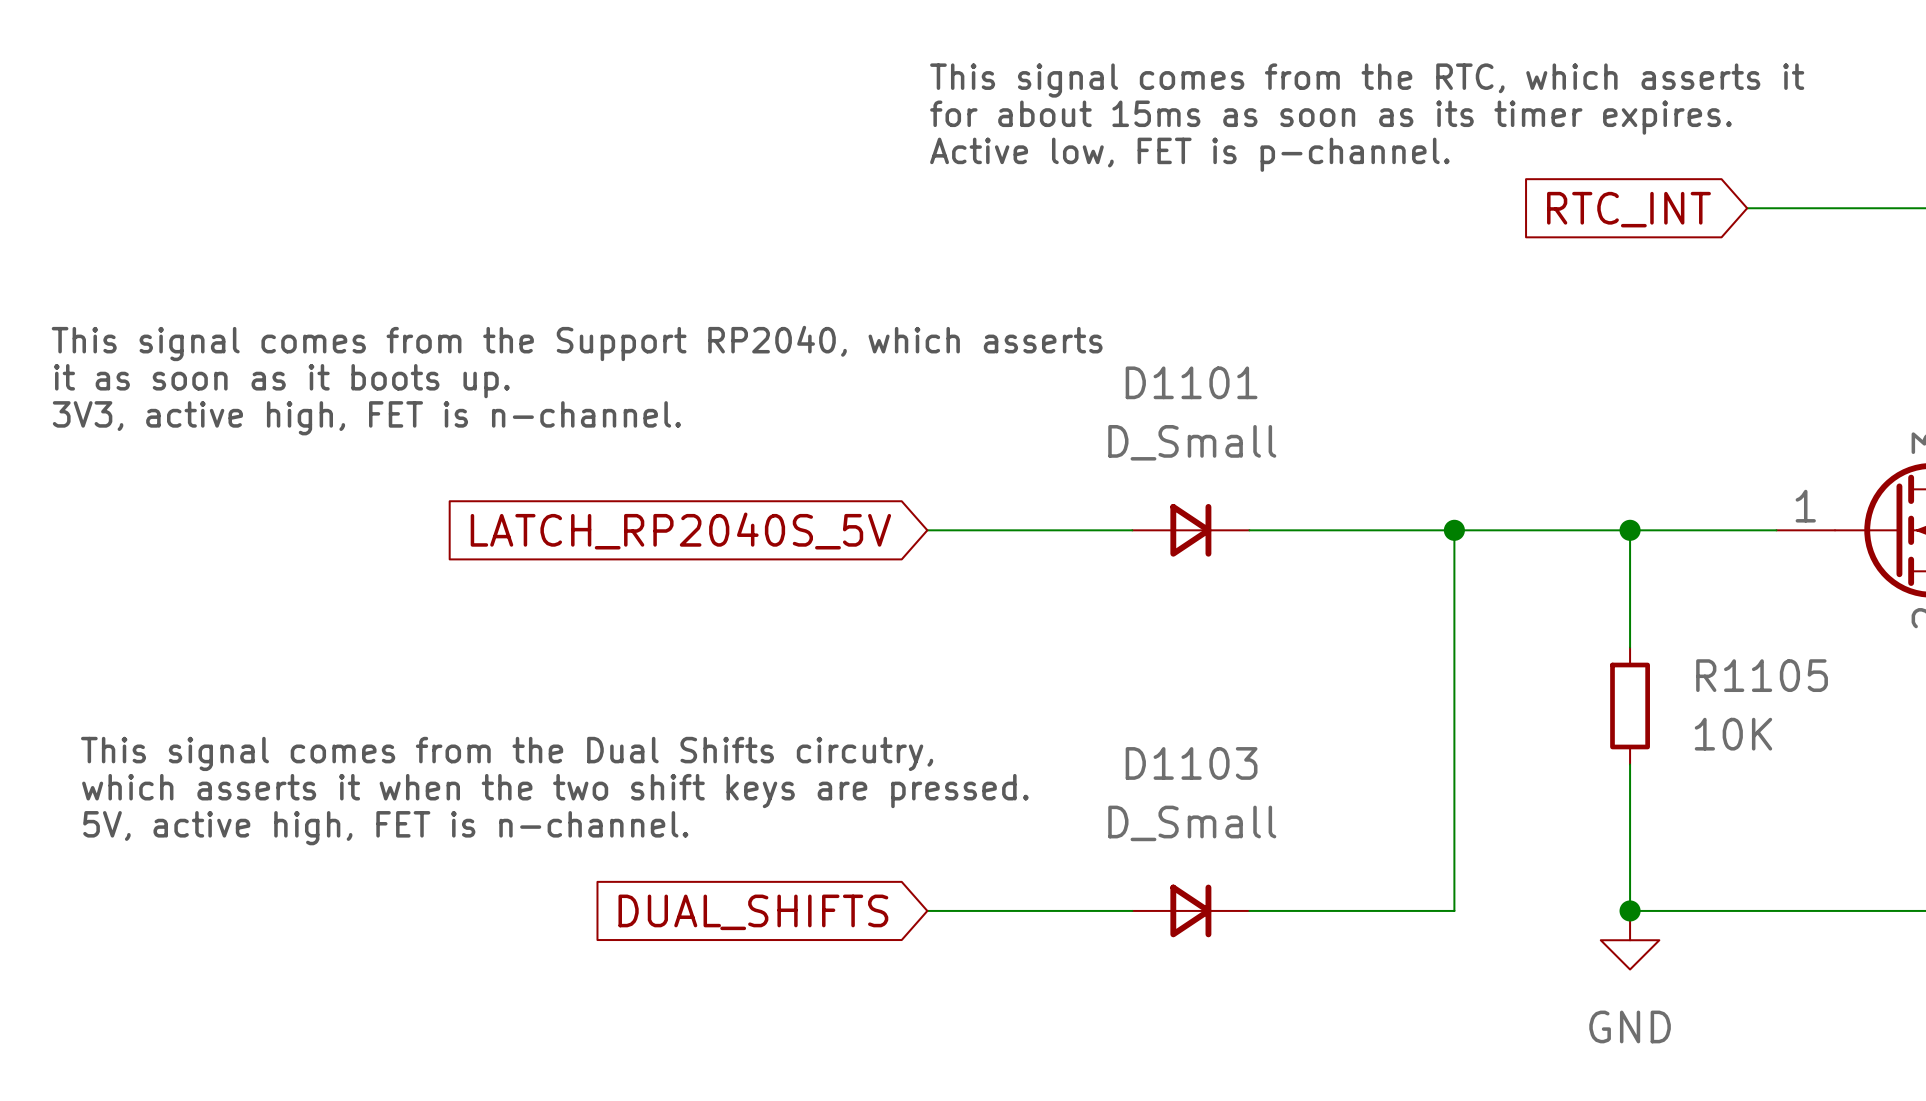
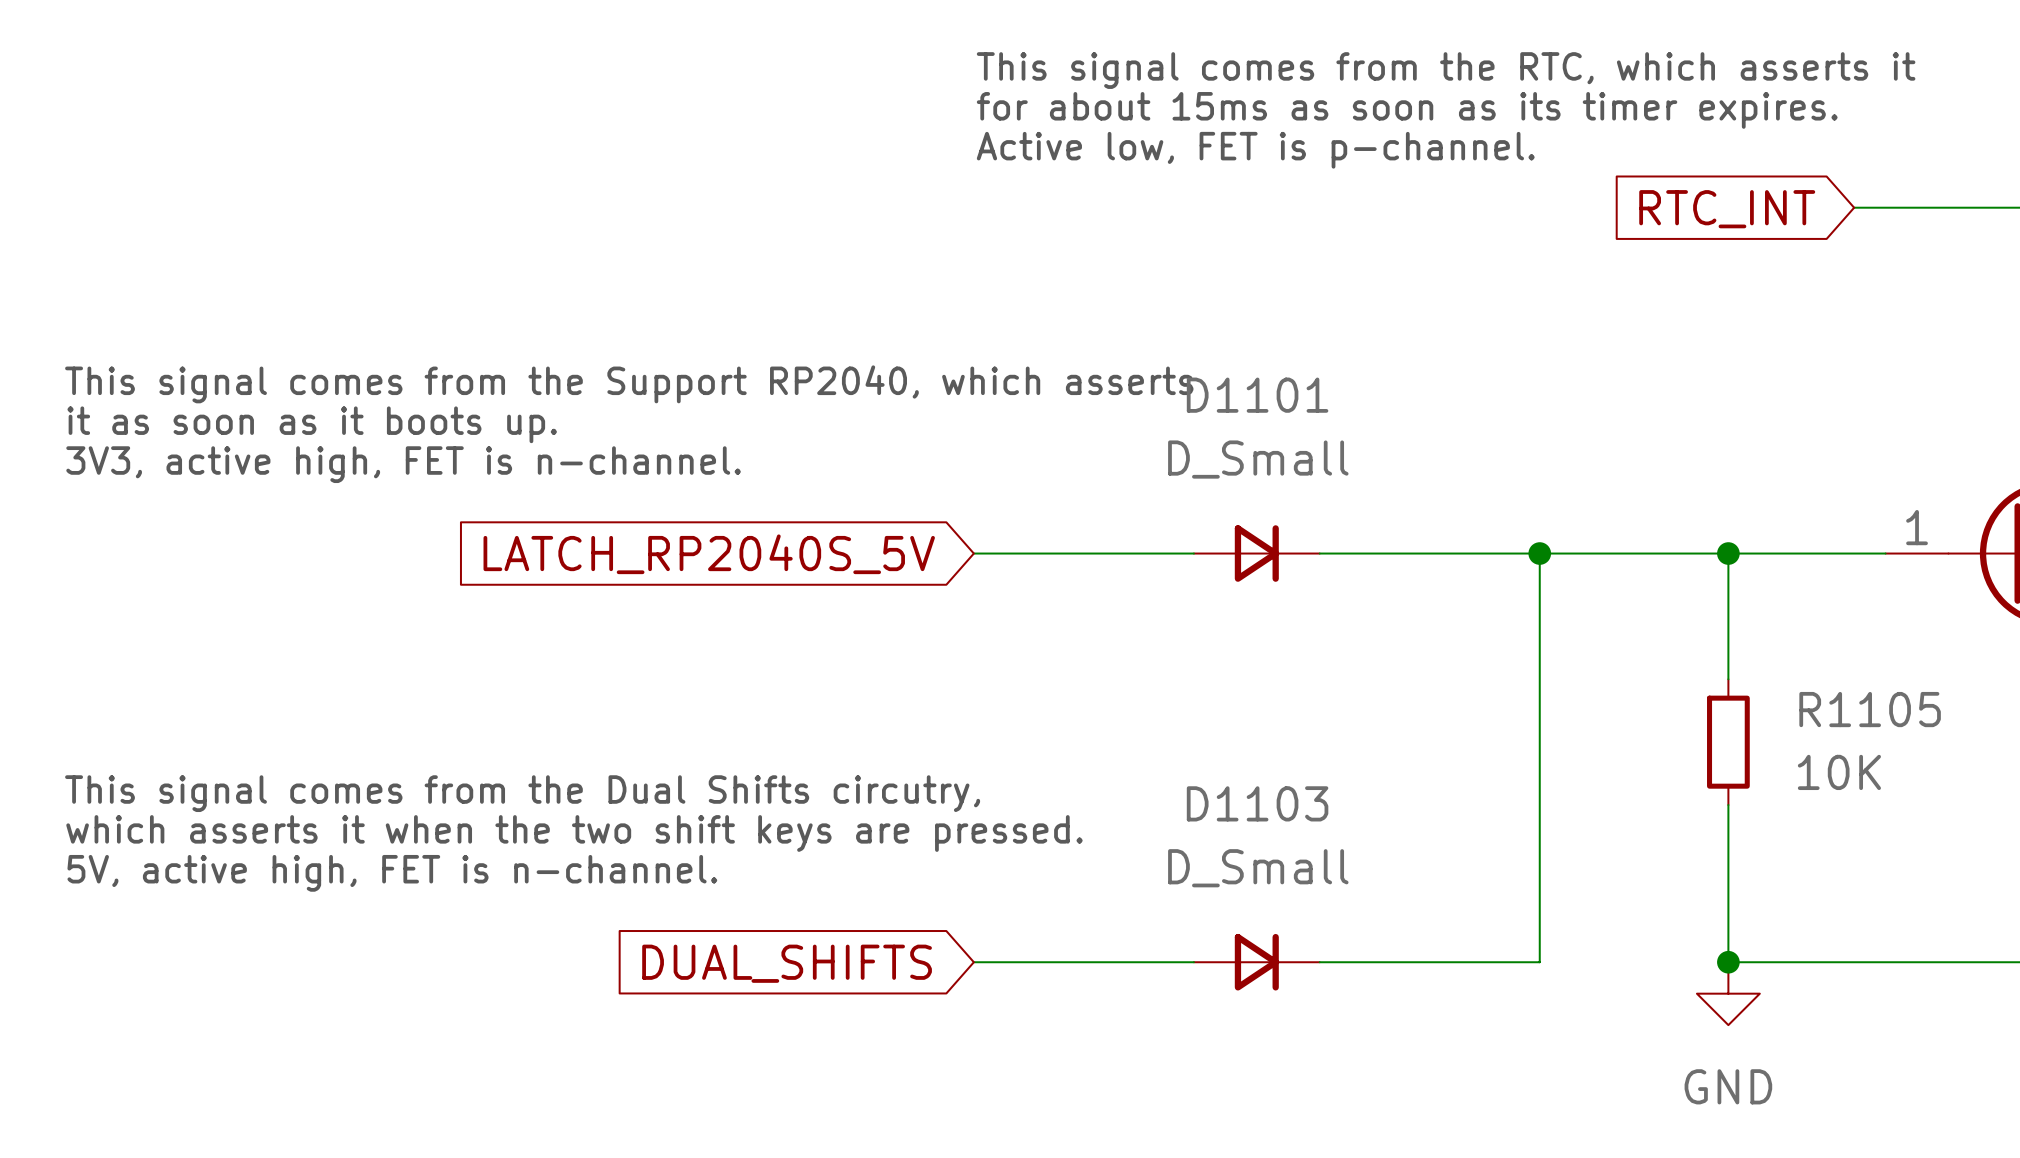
text position: This signal comes from the Support RP2040, which asserts (577, 343) -> This signal comes from the Support RP2040, which asserts (629, 384)
text position: it as soon as it boots up. (281, 381) -> it as soon as it boots up. (312, 424)
text position: 3V3, active high, FET is n-channel. (366, 418) -> 3V3, active high, FET is n-channel. (403, 464)

